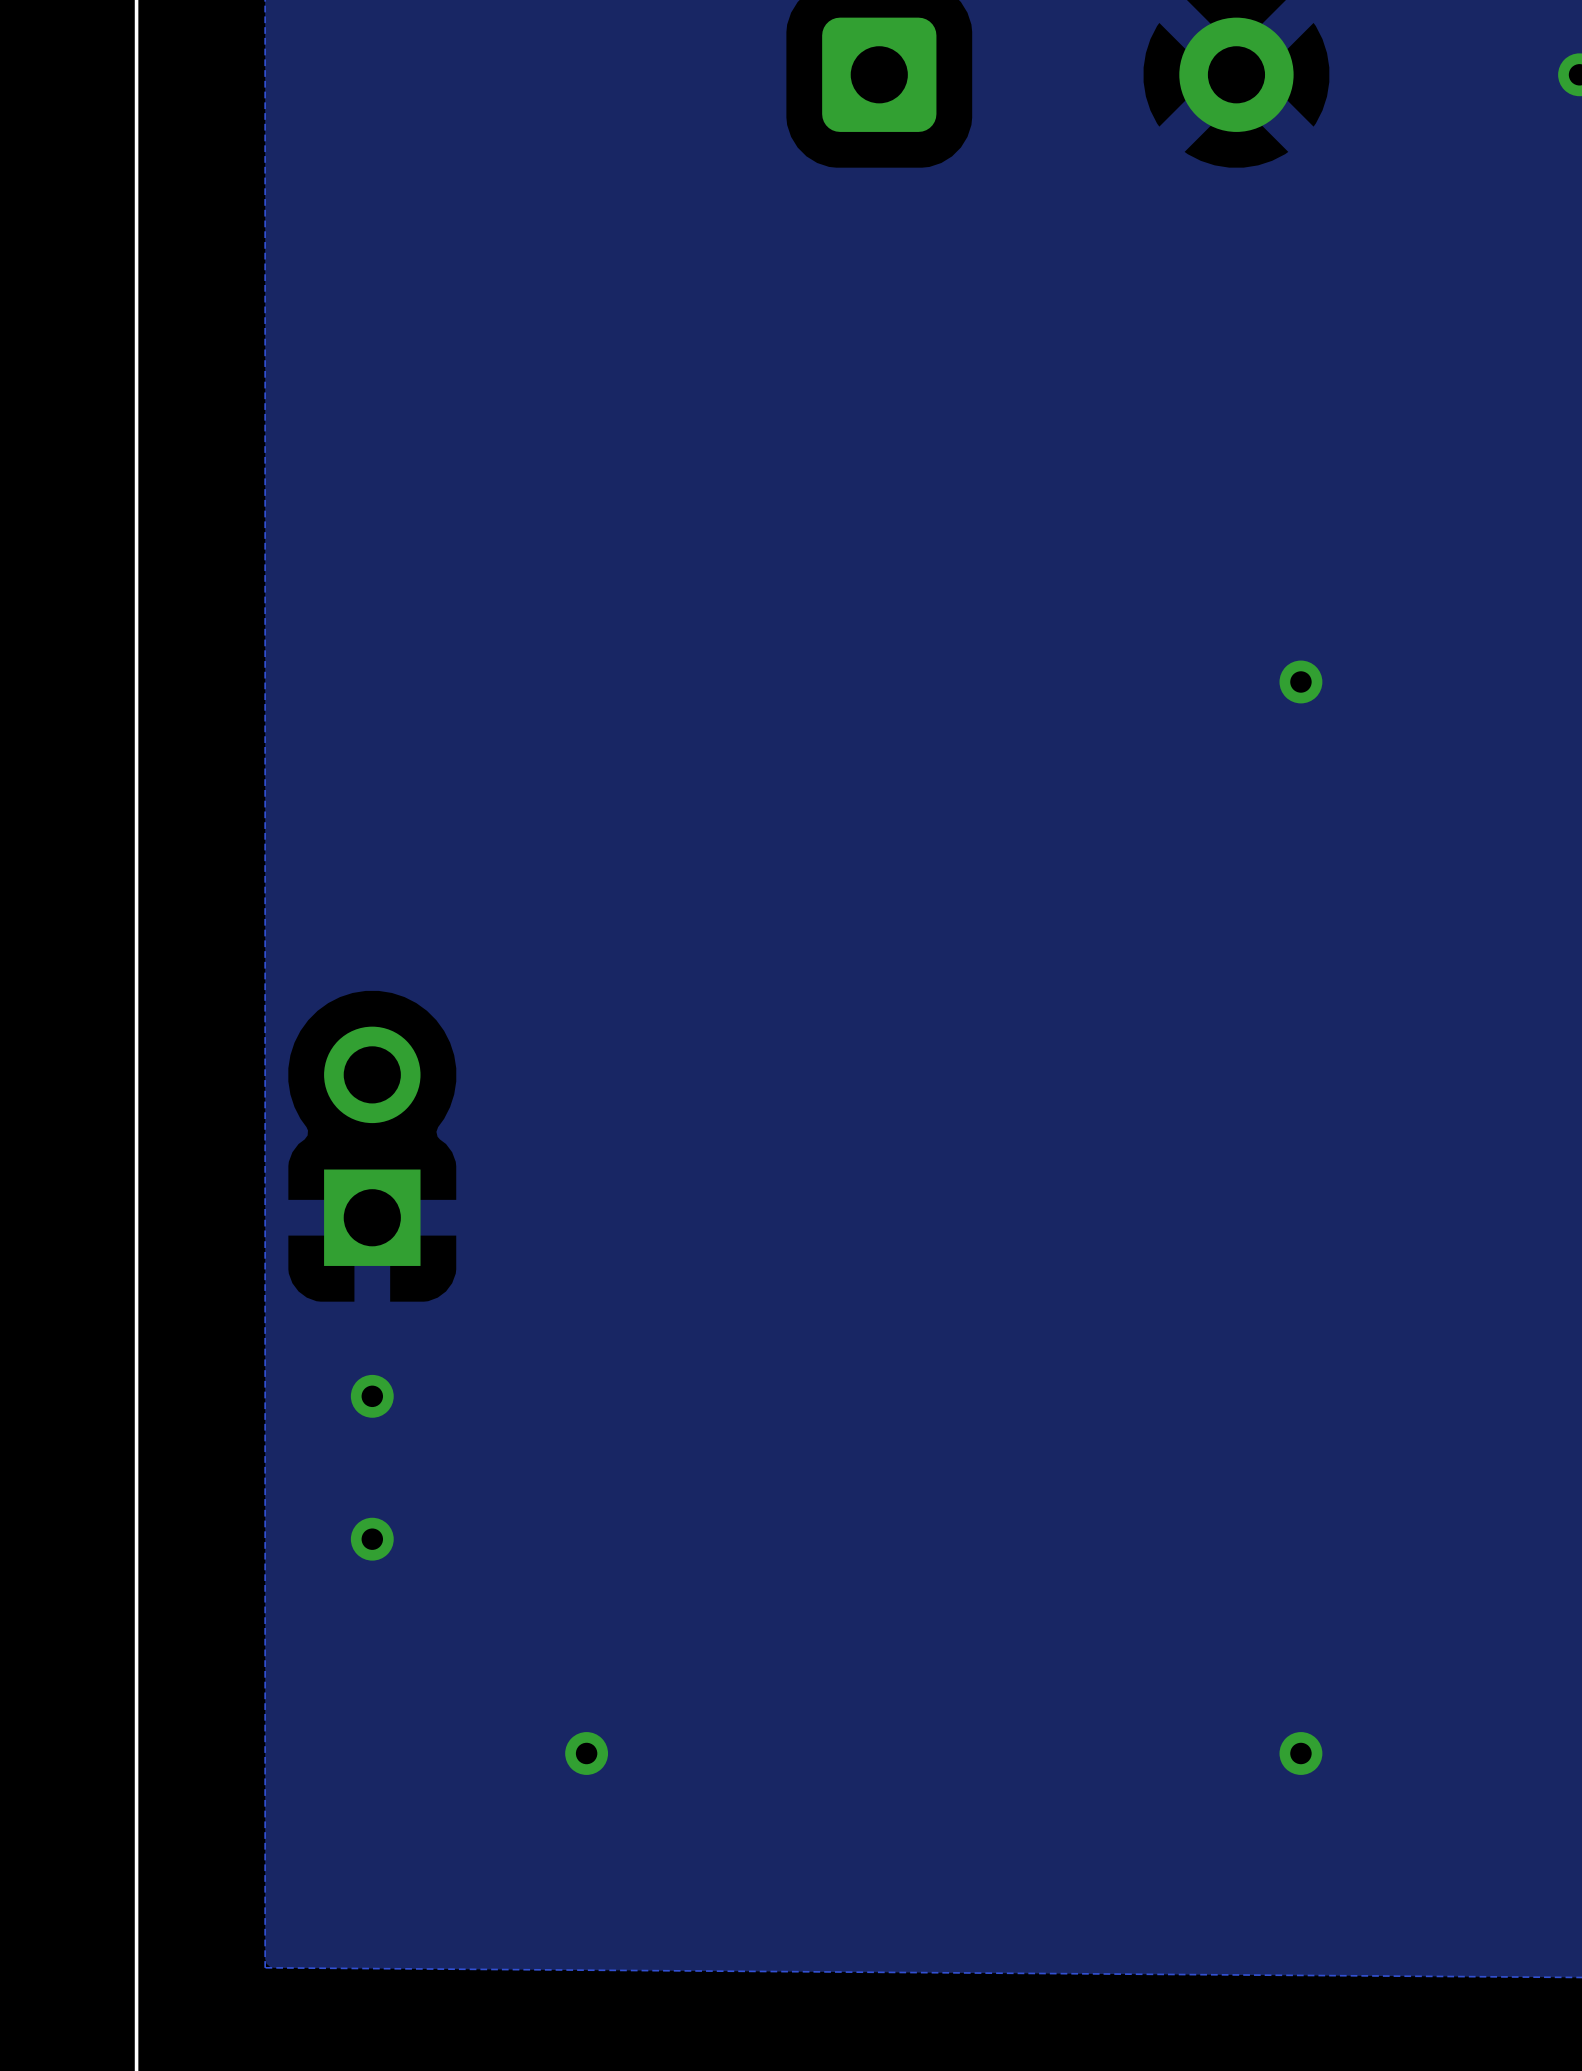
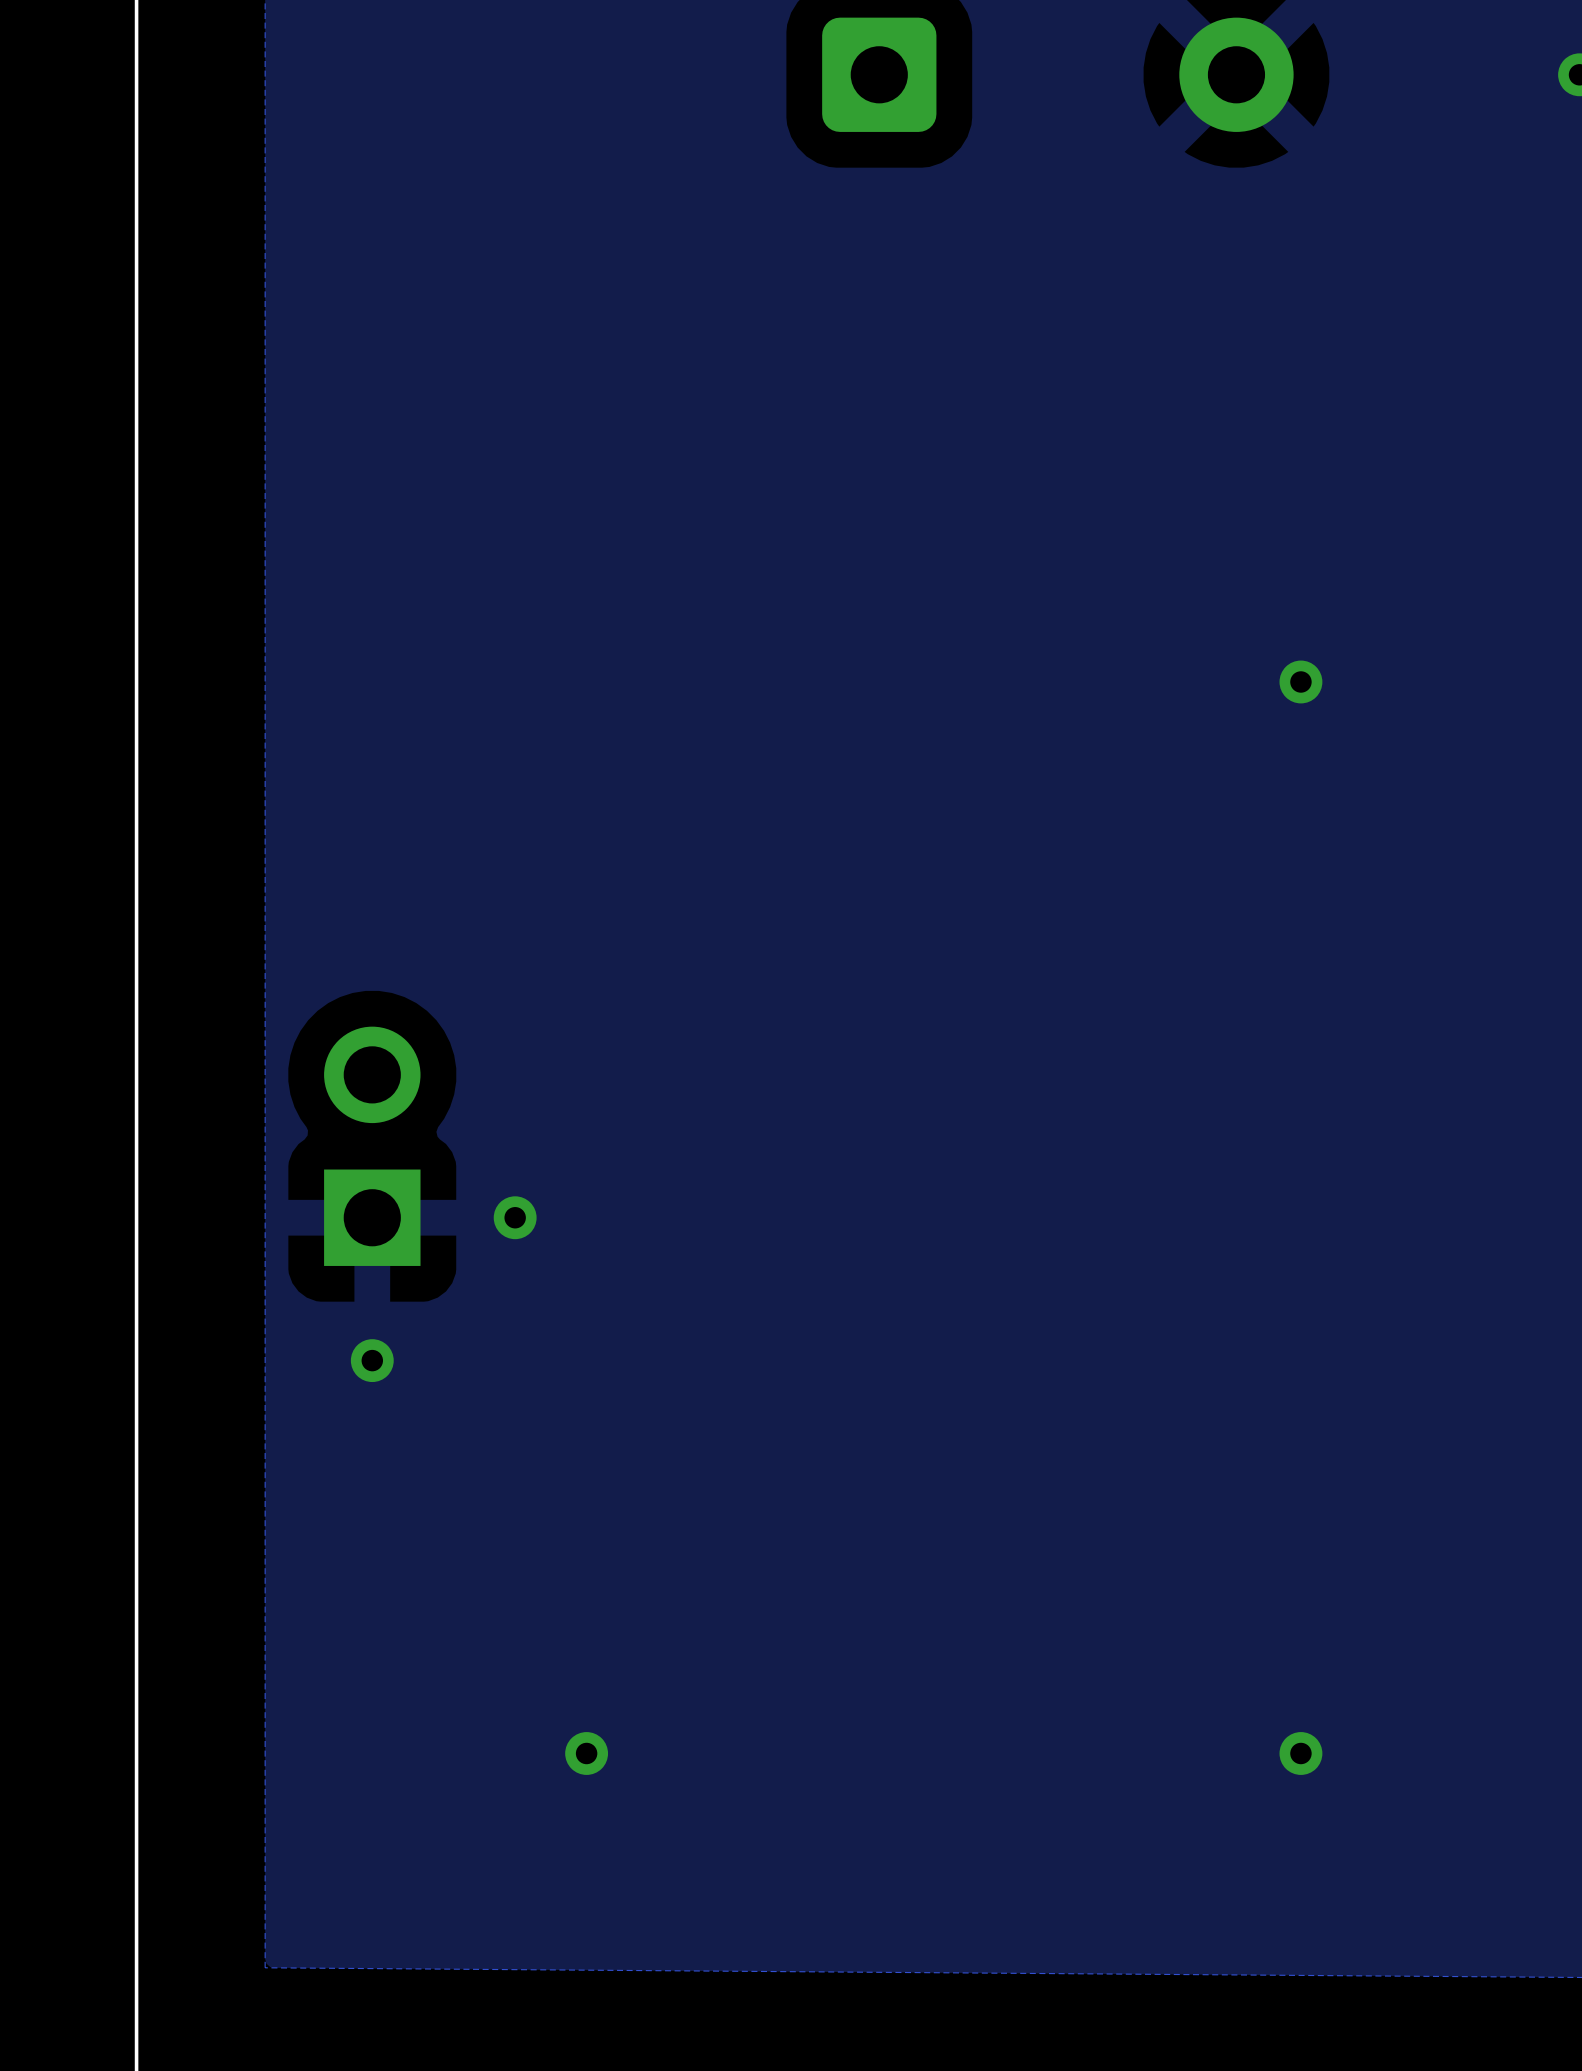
via: none -> (515, 1217)
via position: (372, 1396) -> (372, 1360)
via: (372, 1539) -> none

